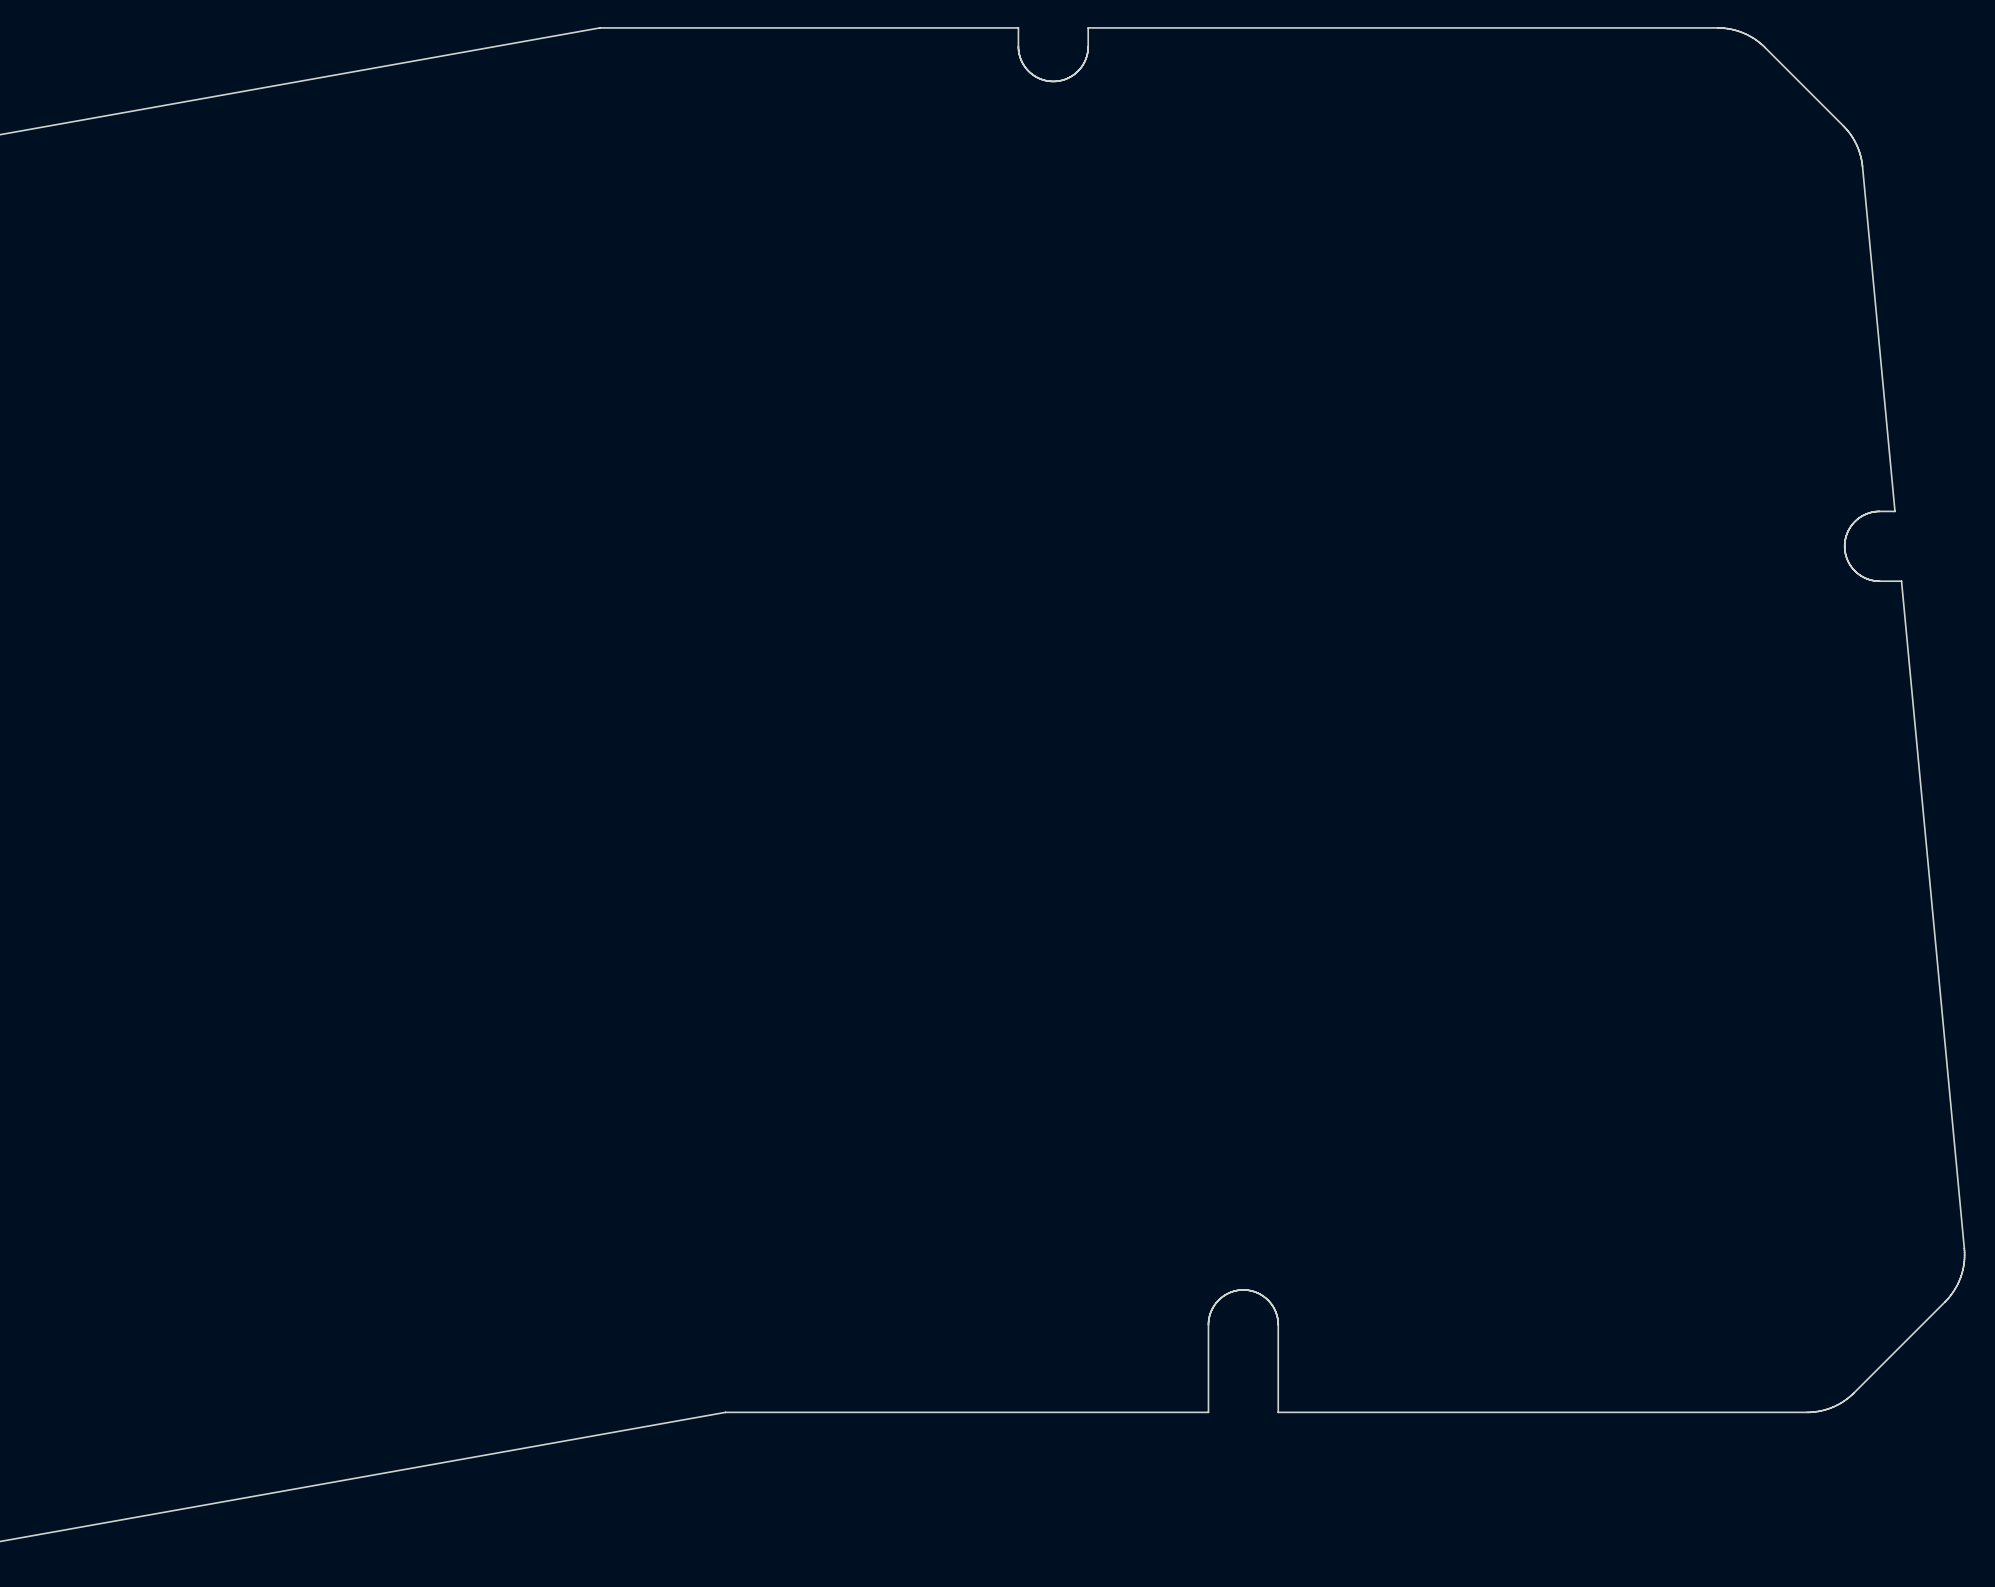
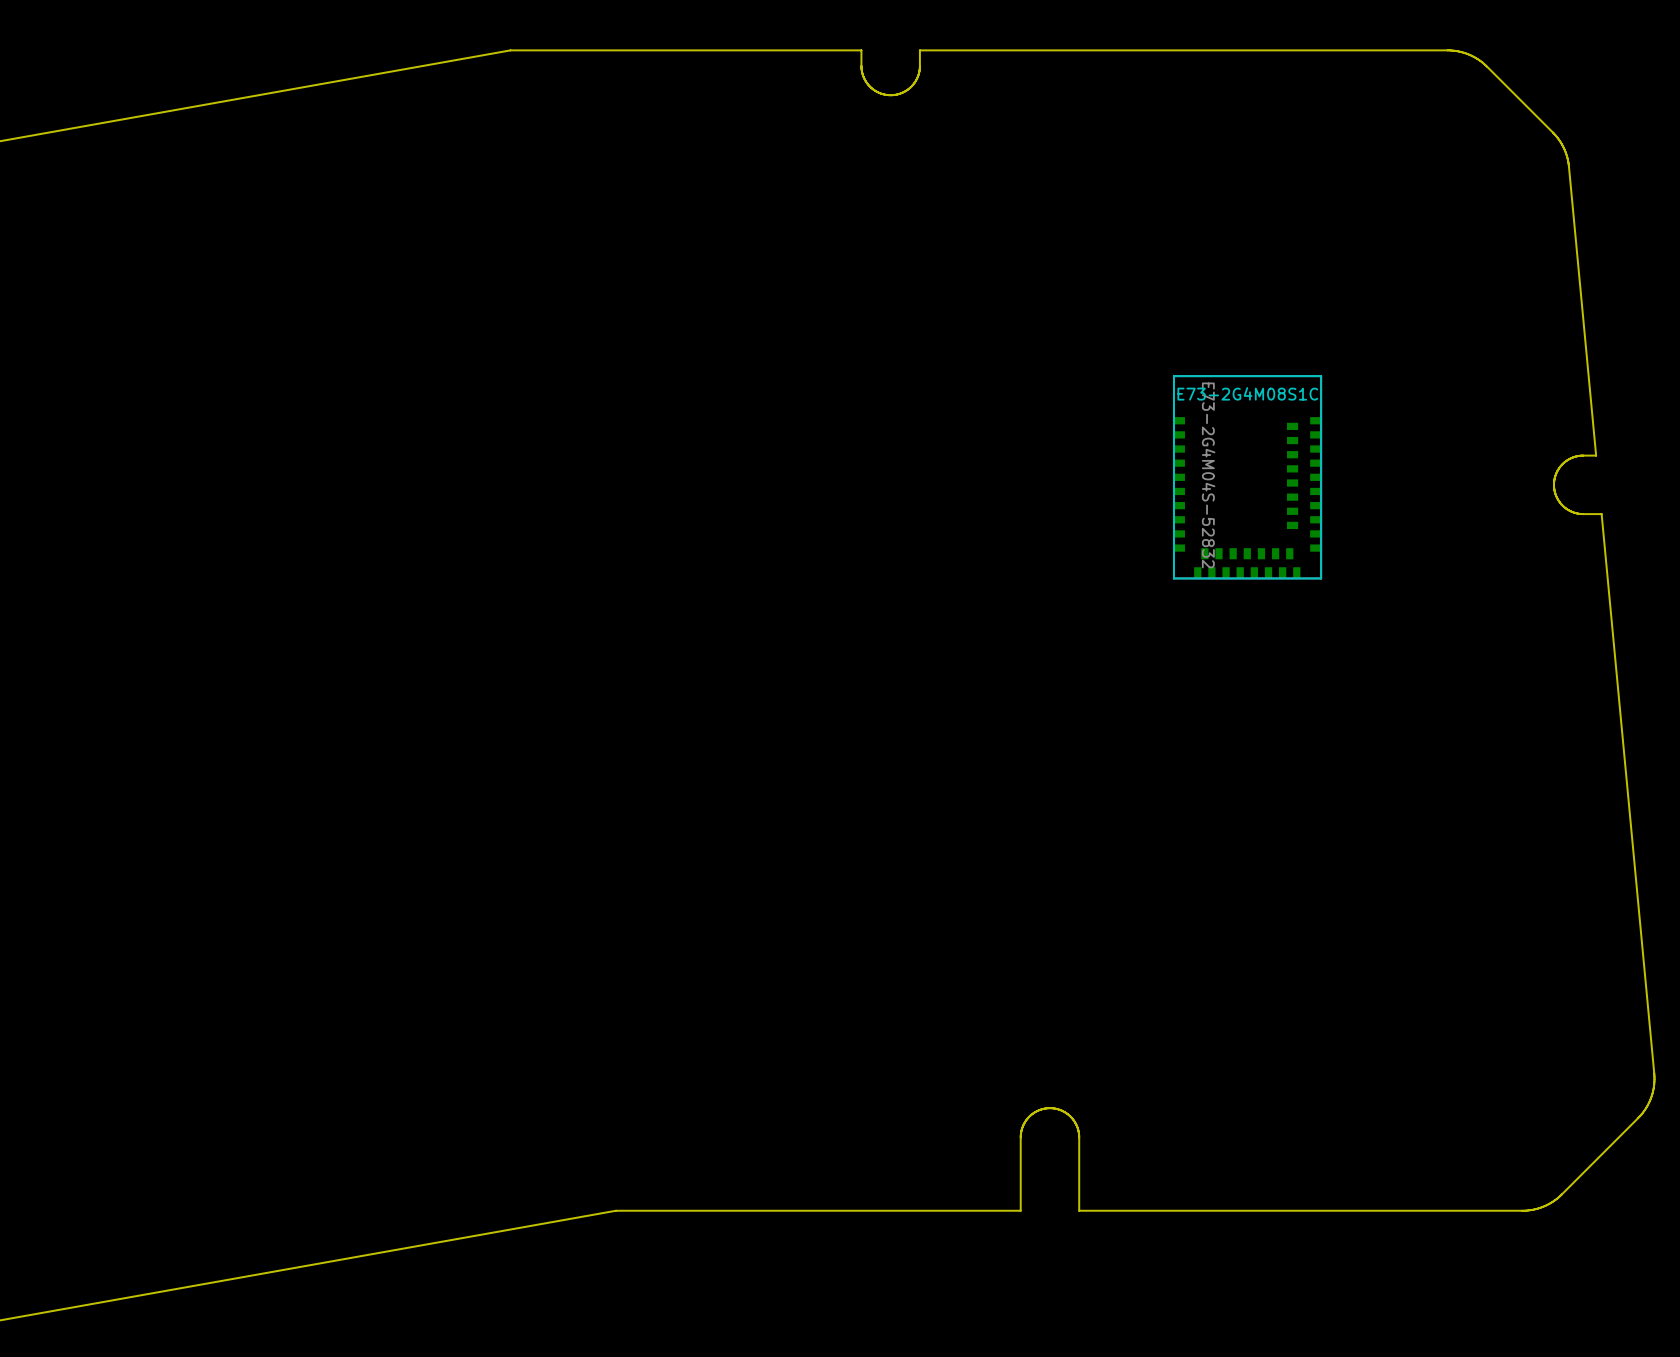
part: none -> E73-2G4M04S-52832 (1247, 477)

